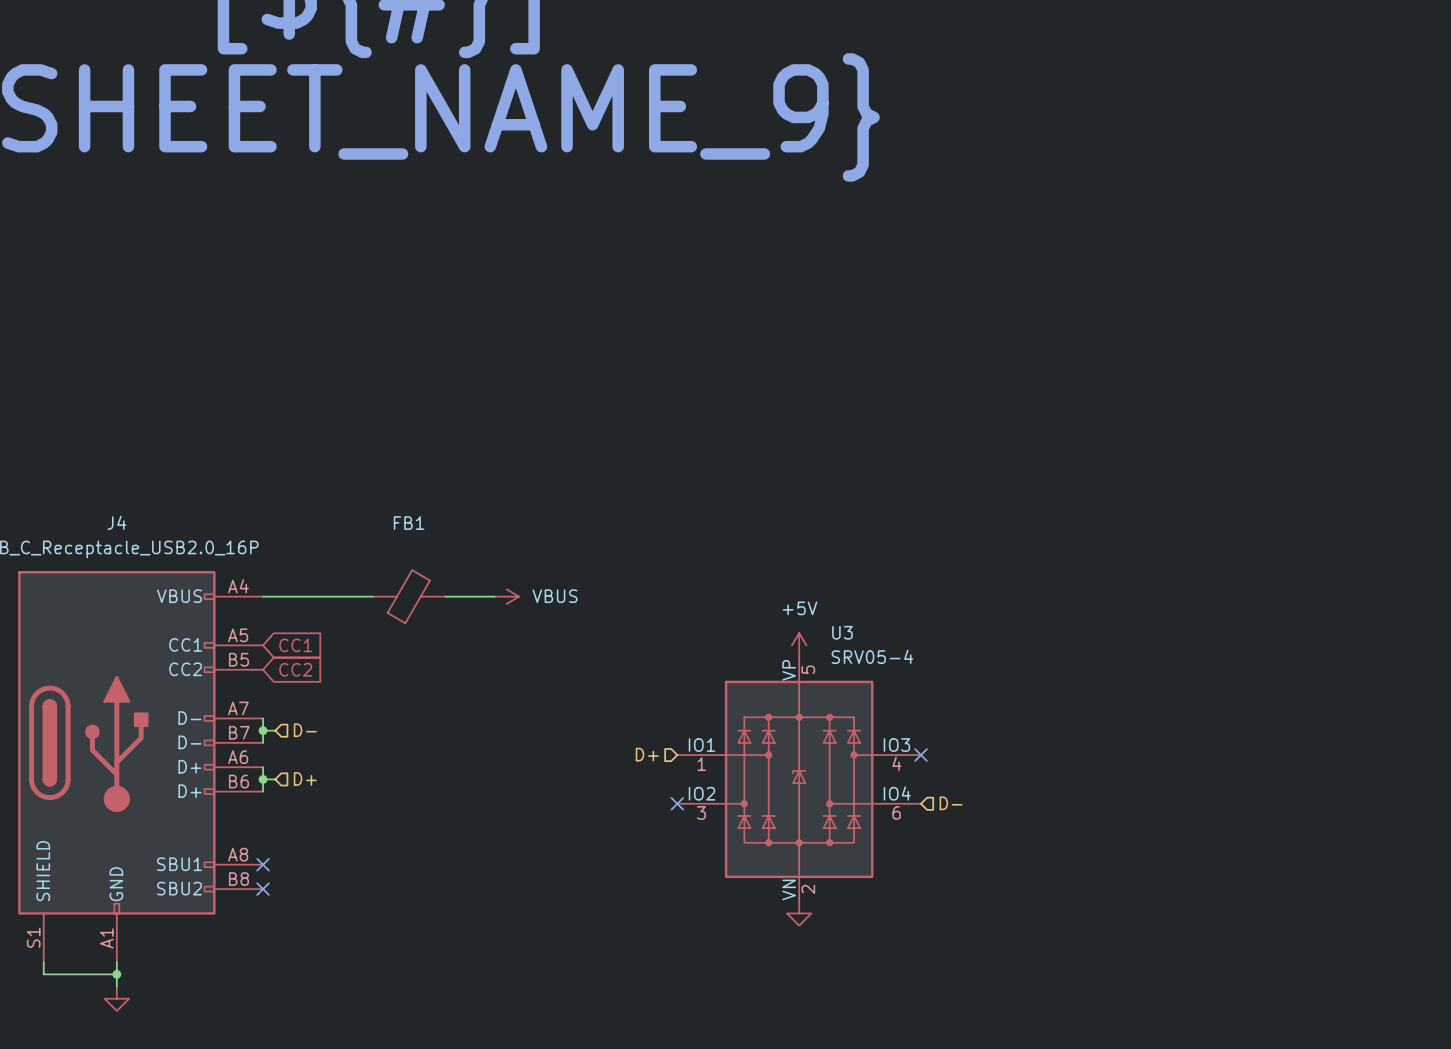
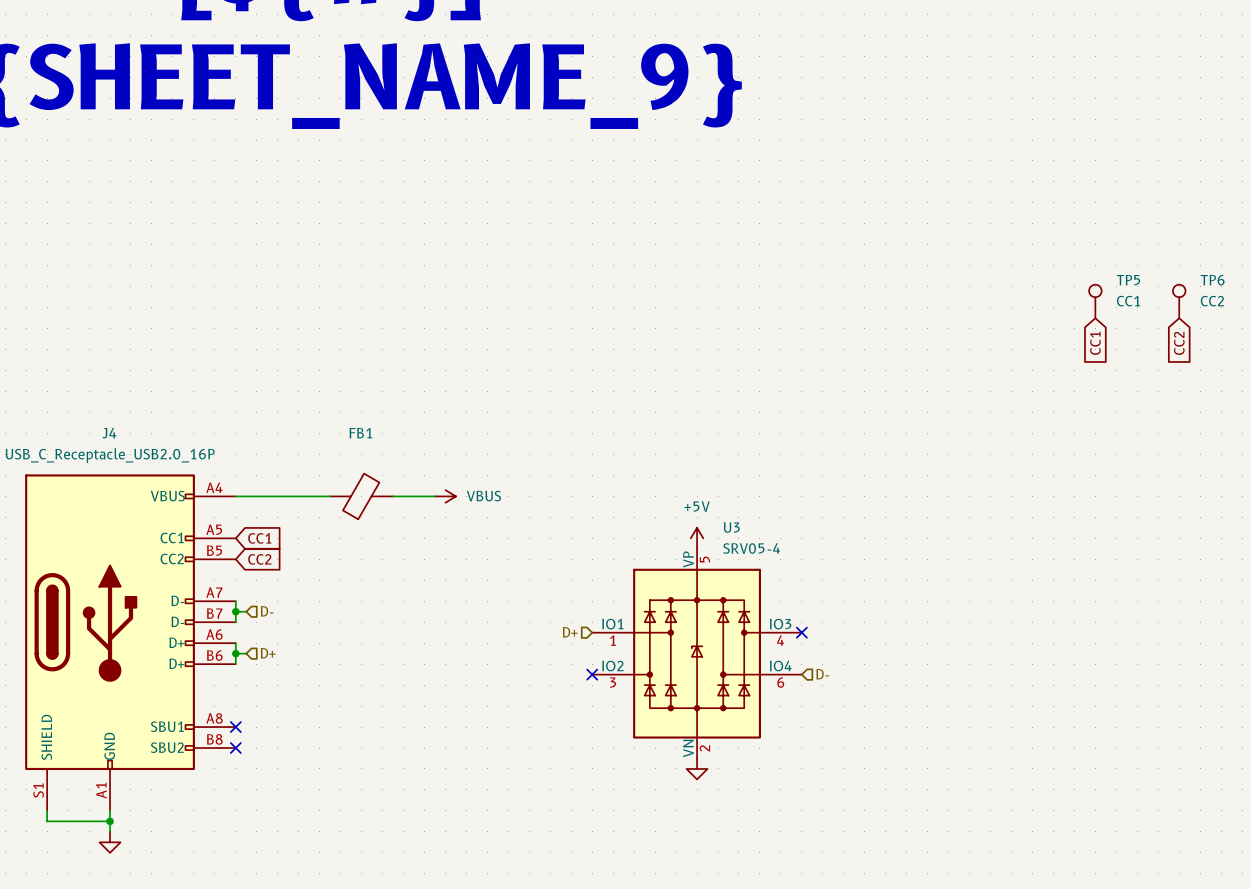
TP5: none -> CC1 (1095, 301)
TP6: none -> CC2 (1179, 301)
global label: none -> CC1 (1095, 343)
global label: none -> CC2 (1179, 343)

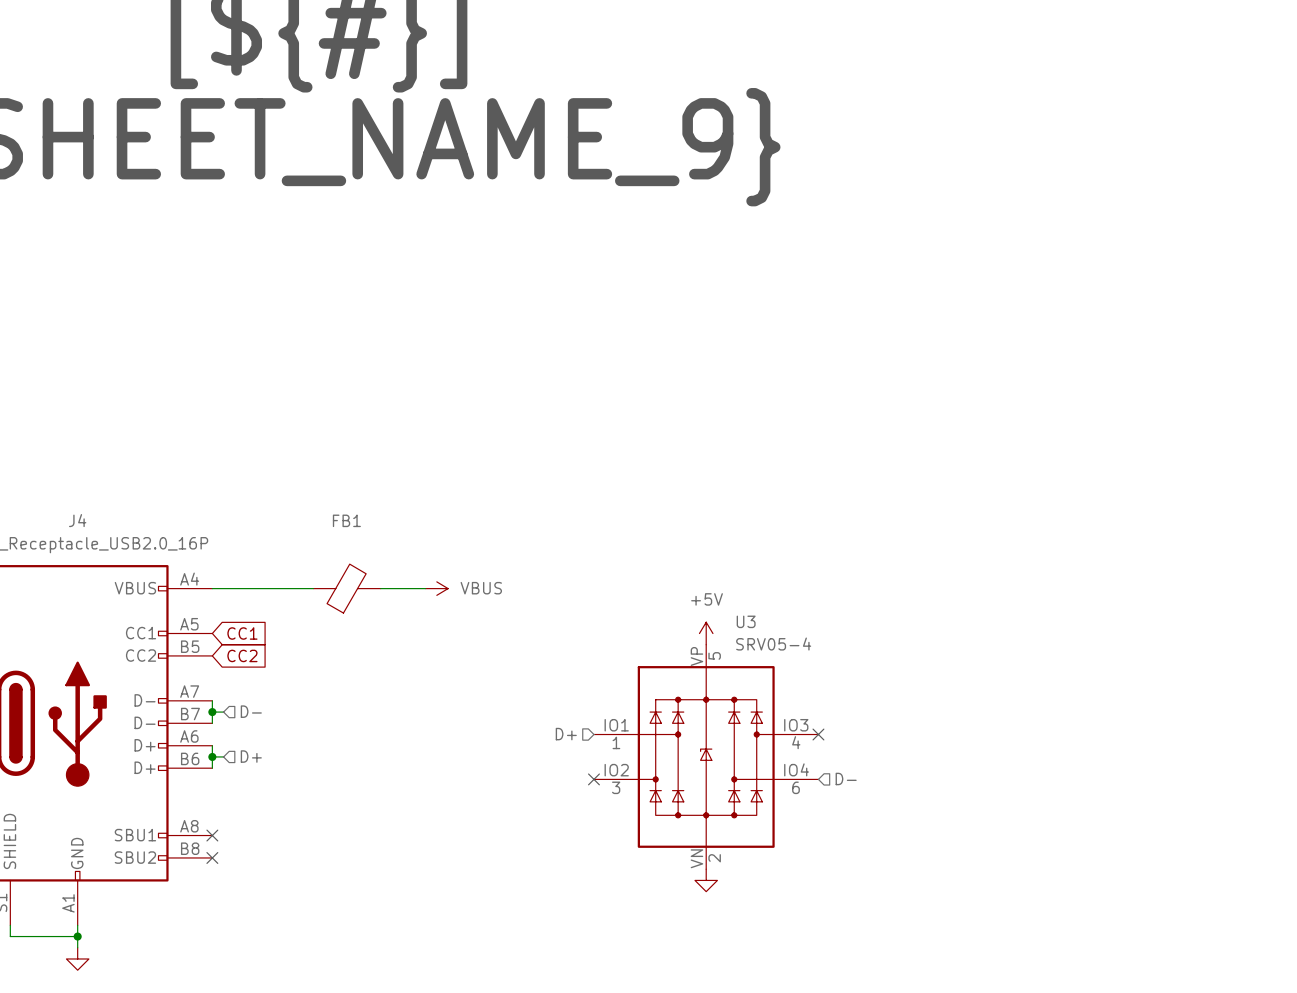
TP5: CC1 (1095, 301) -> none
TP6: CC2 (1179, 301) -> none
global label: CC1 (1095, 343) -> none
global label: CC2 (1179, 343) -> none

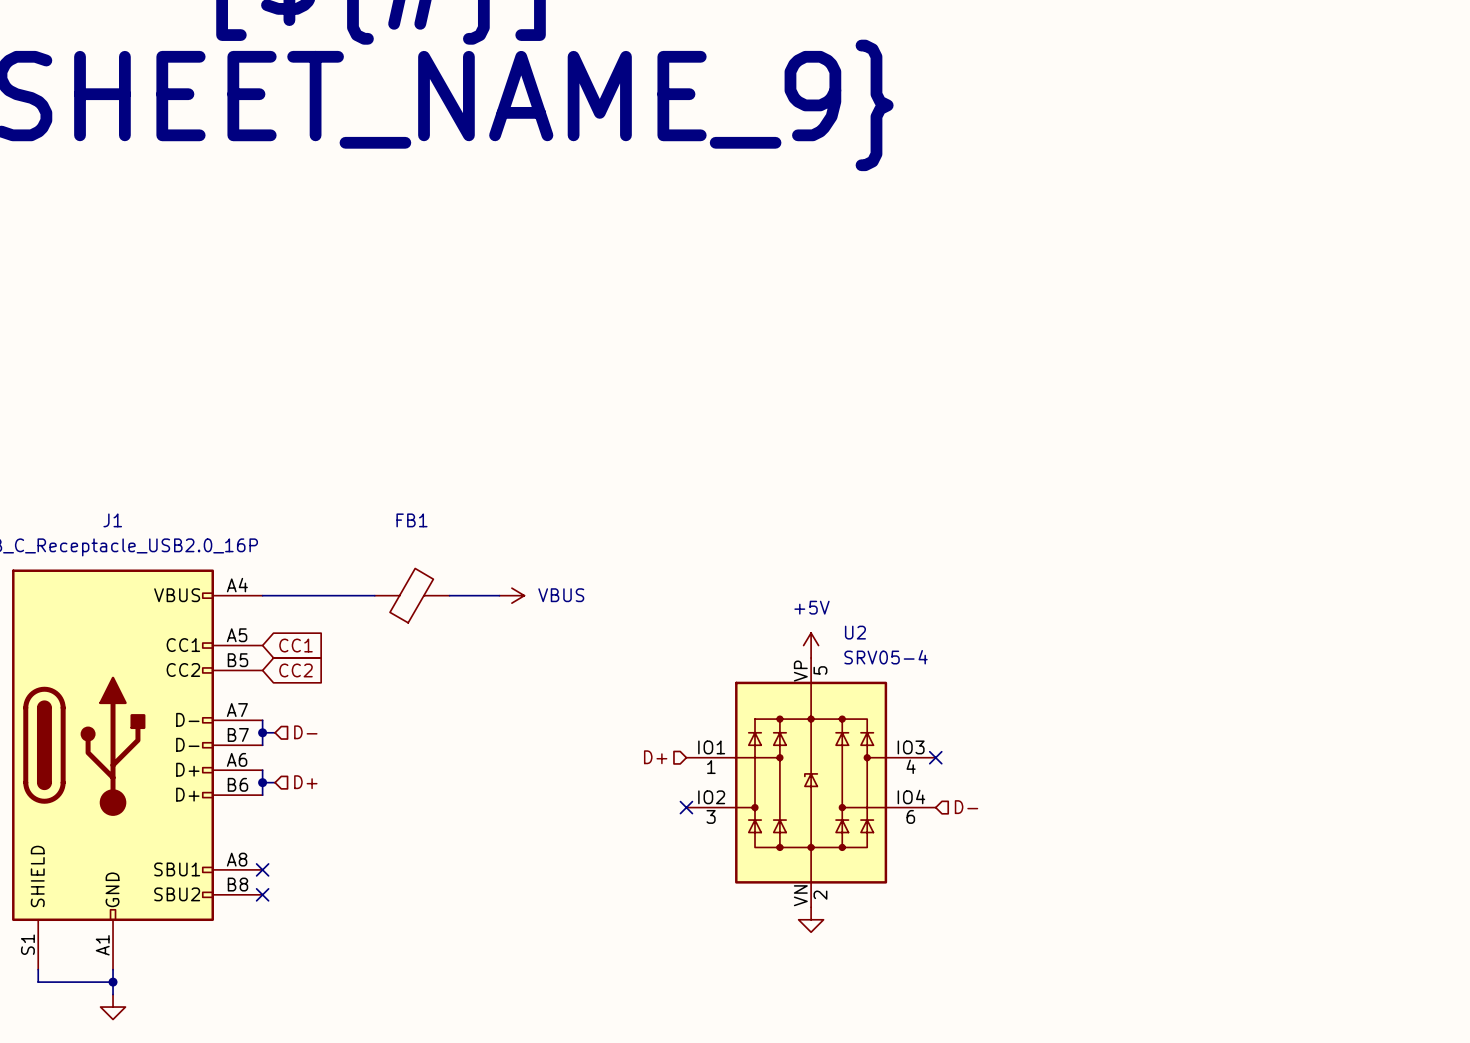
J4 name: J4 (77, 520) -> J1 (112, 520)
U3 name: U3 (746, 621) -> U2 (855, 632)

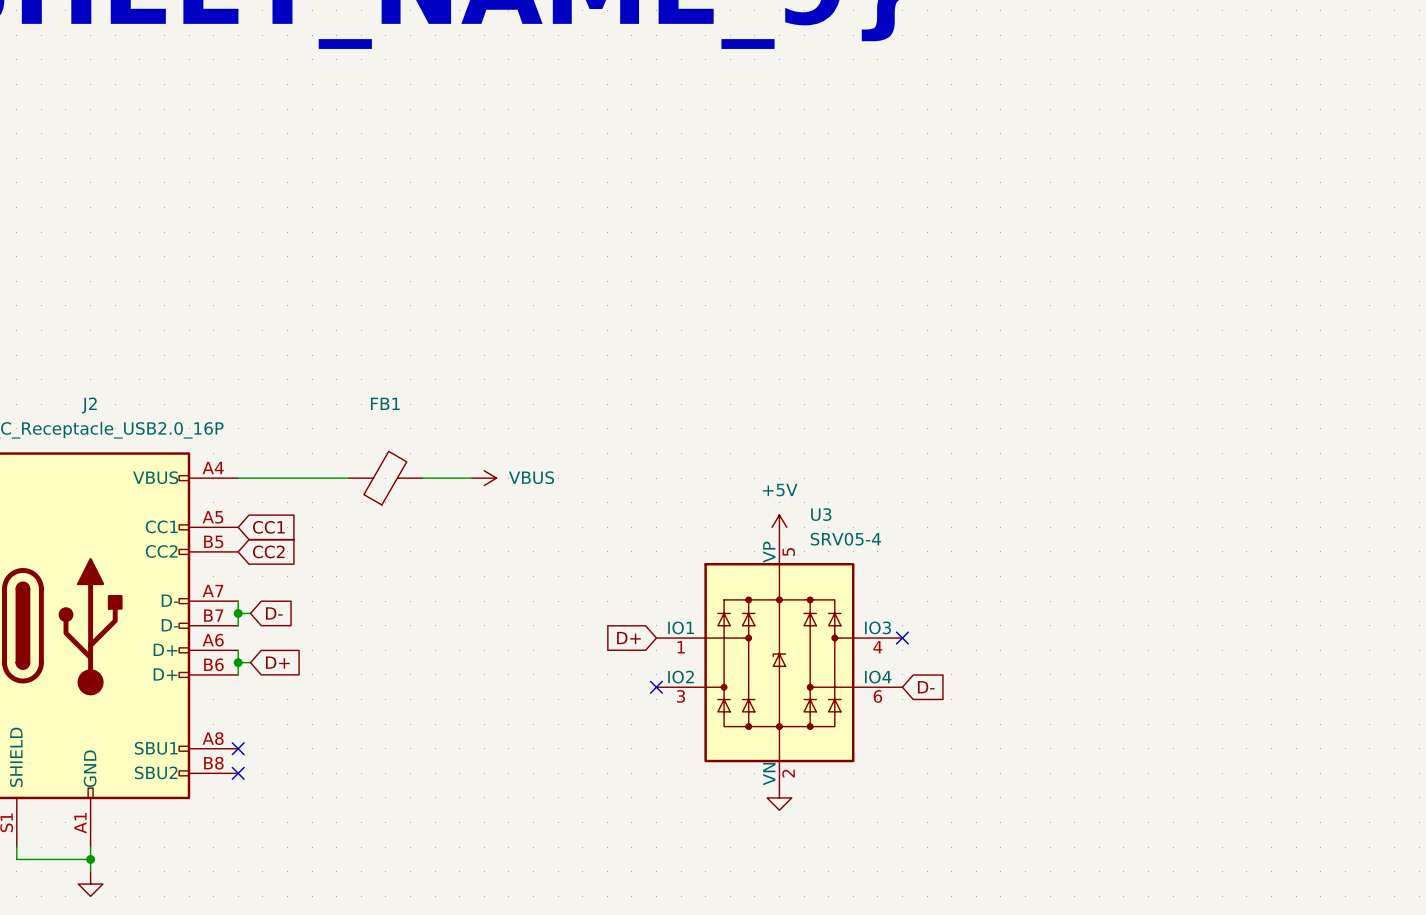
J1 name: J1 (112, 520) -> J2 (89, 405)
U2 name: U2 (855, 632) -> U3 (821, 514)
global label: none -> D- (274, 613)
hierarchical label: D- (305, 732) -> none
hierarchical label: D+ (655, 757) -> none
global label: none -> D+ (628, 638)
global label: none -> D+ (277, 662)
hierarchical label: D+ (305, 782) -> none
global label: none -> D- (926, 687)
hierarchical label: D- (966, 807) -> none

